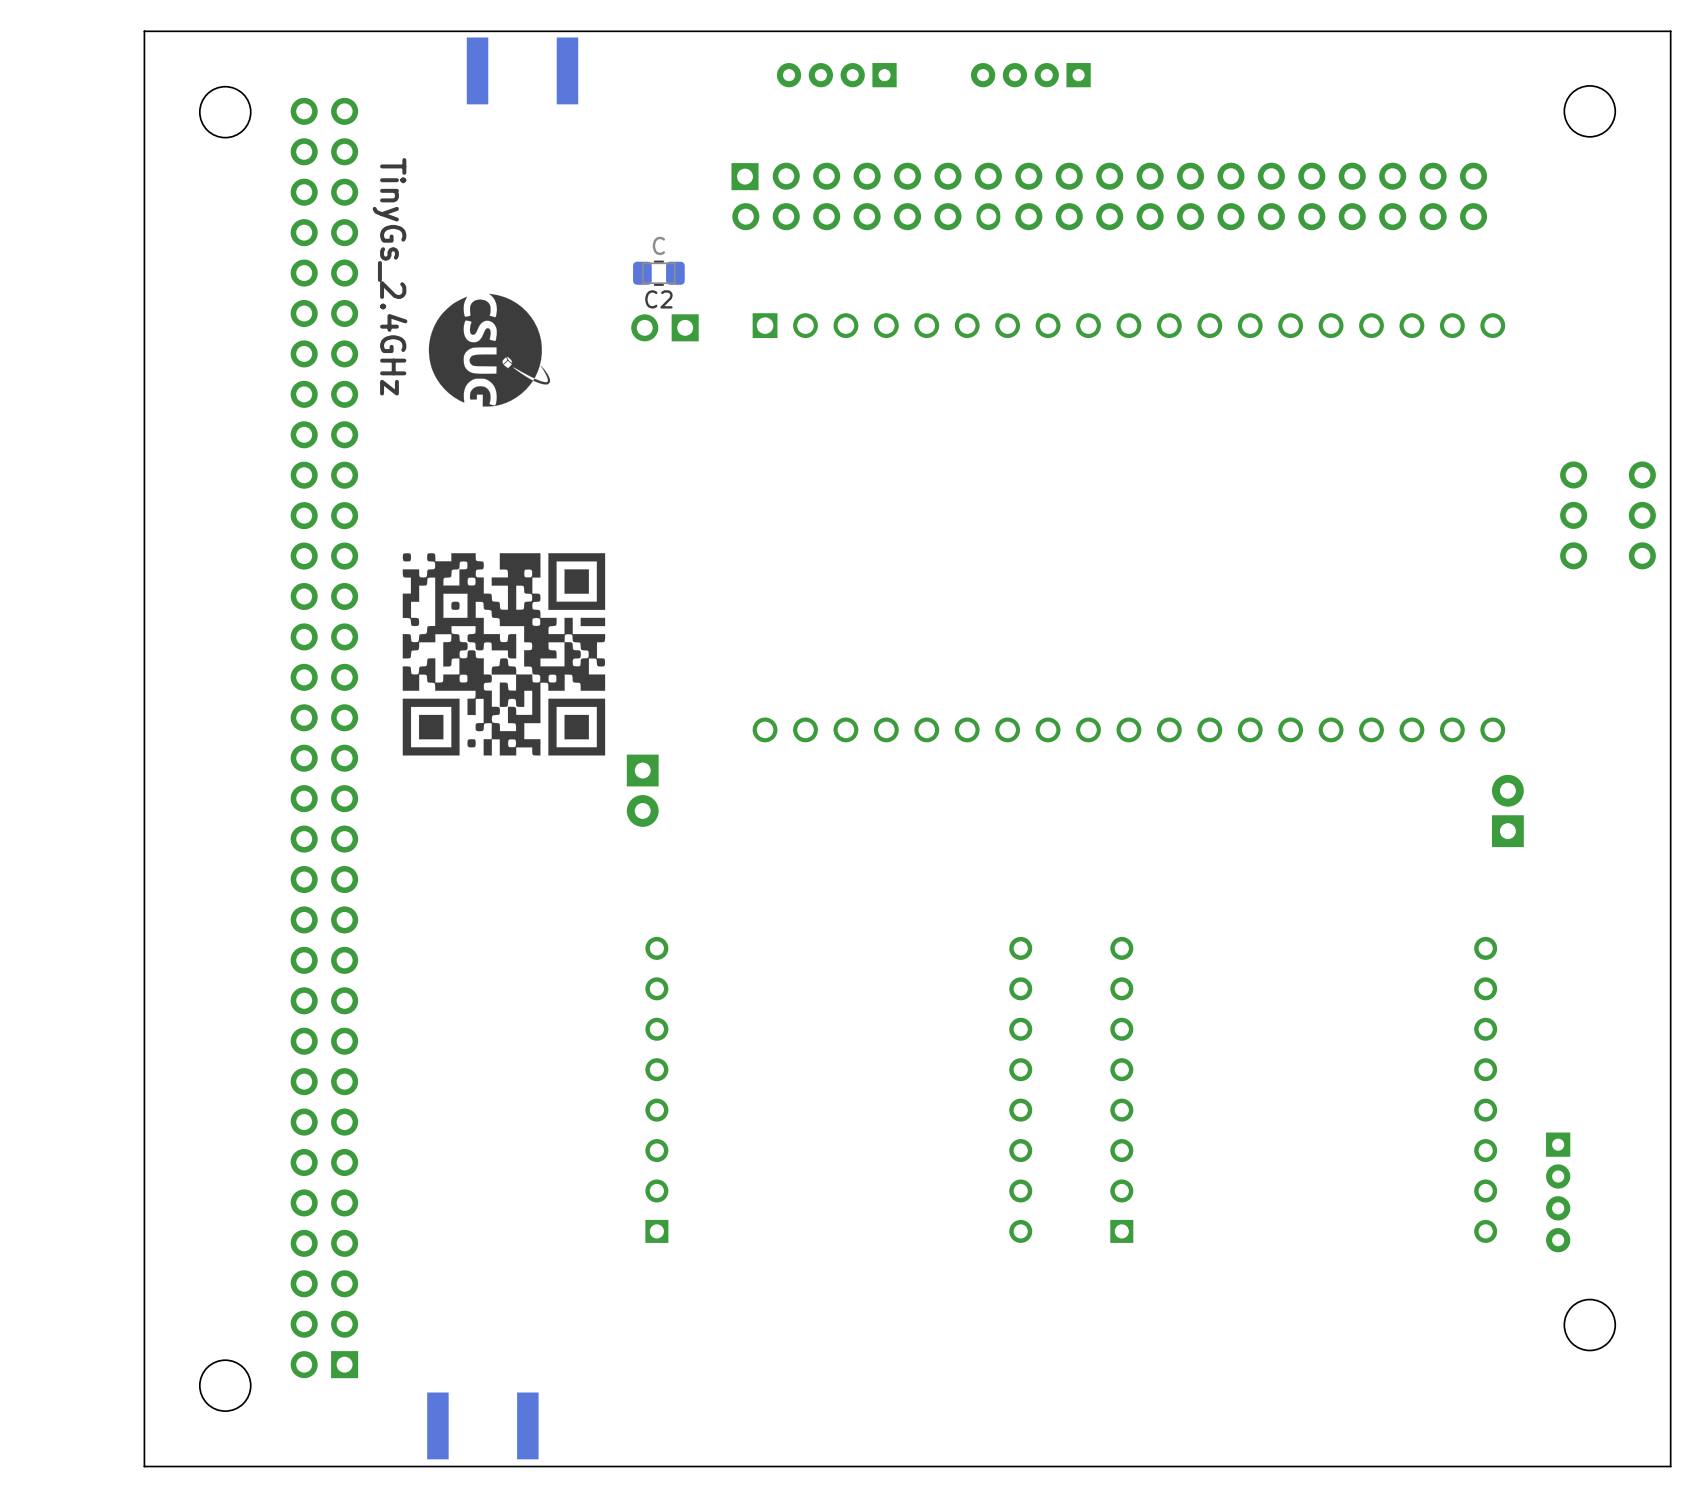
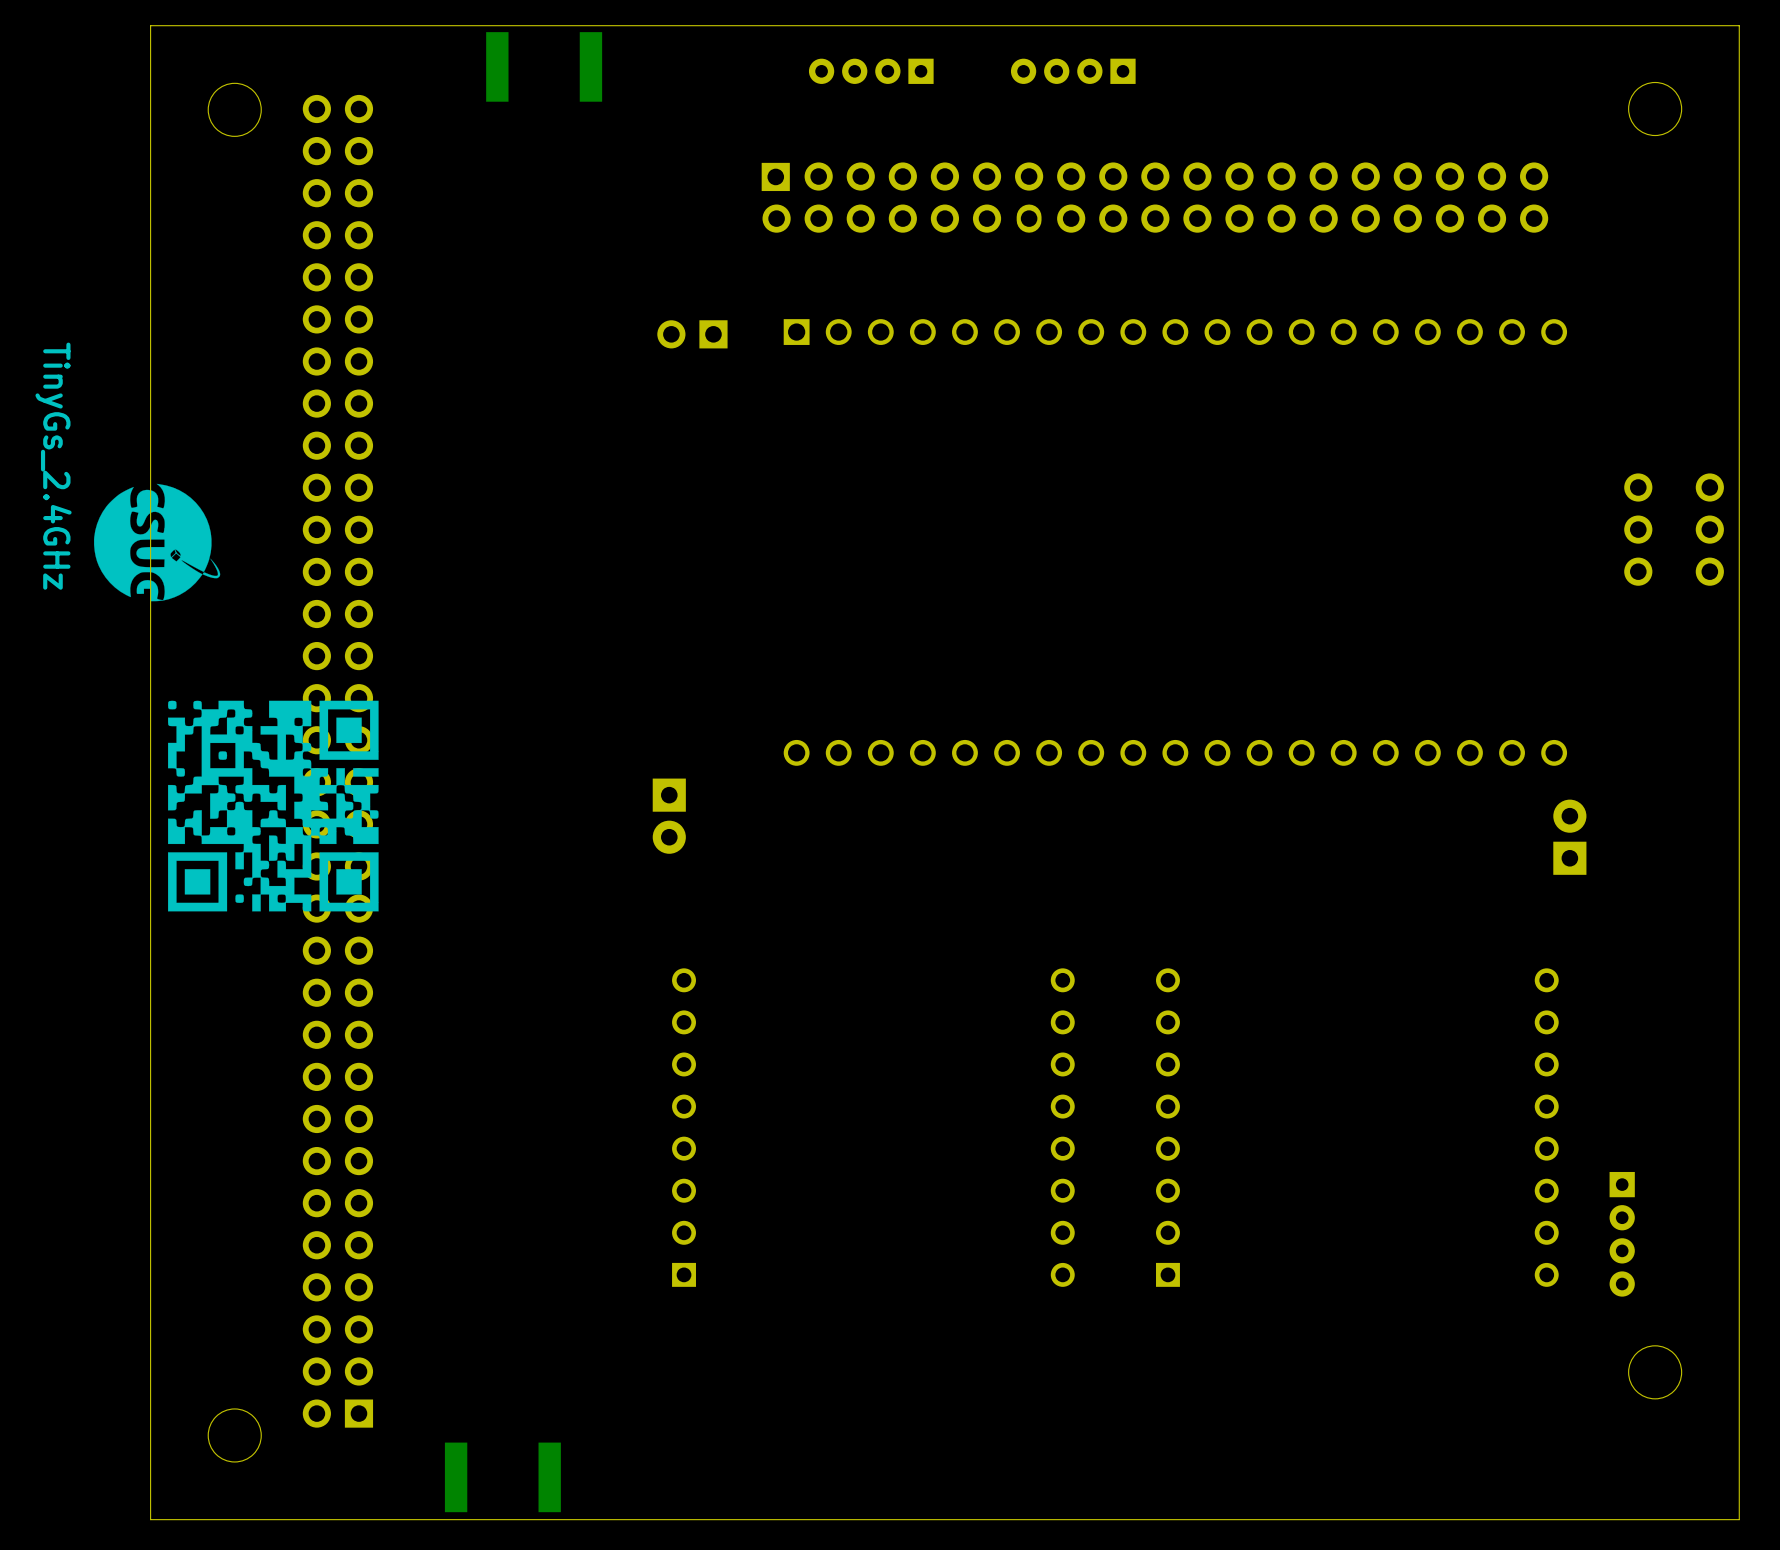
C2: C (658, 273) -> none
text position: TinyGs_2.4GHz (390, 276) -> TinyGs_2.4GHz (53, 466)
drawing position: (489, 350) -> (157, 542)
drawing position: (503, 654) -> (273, 806)

